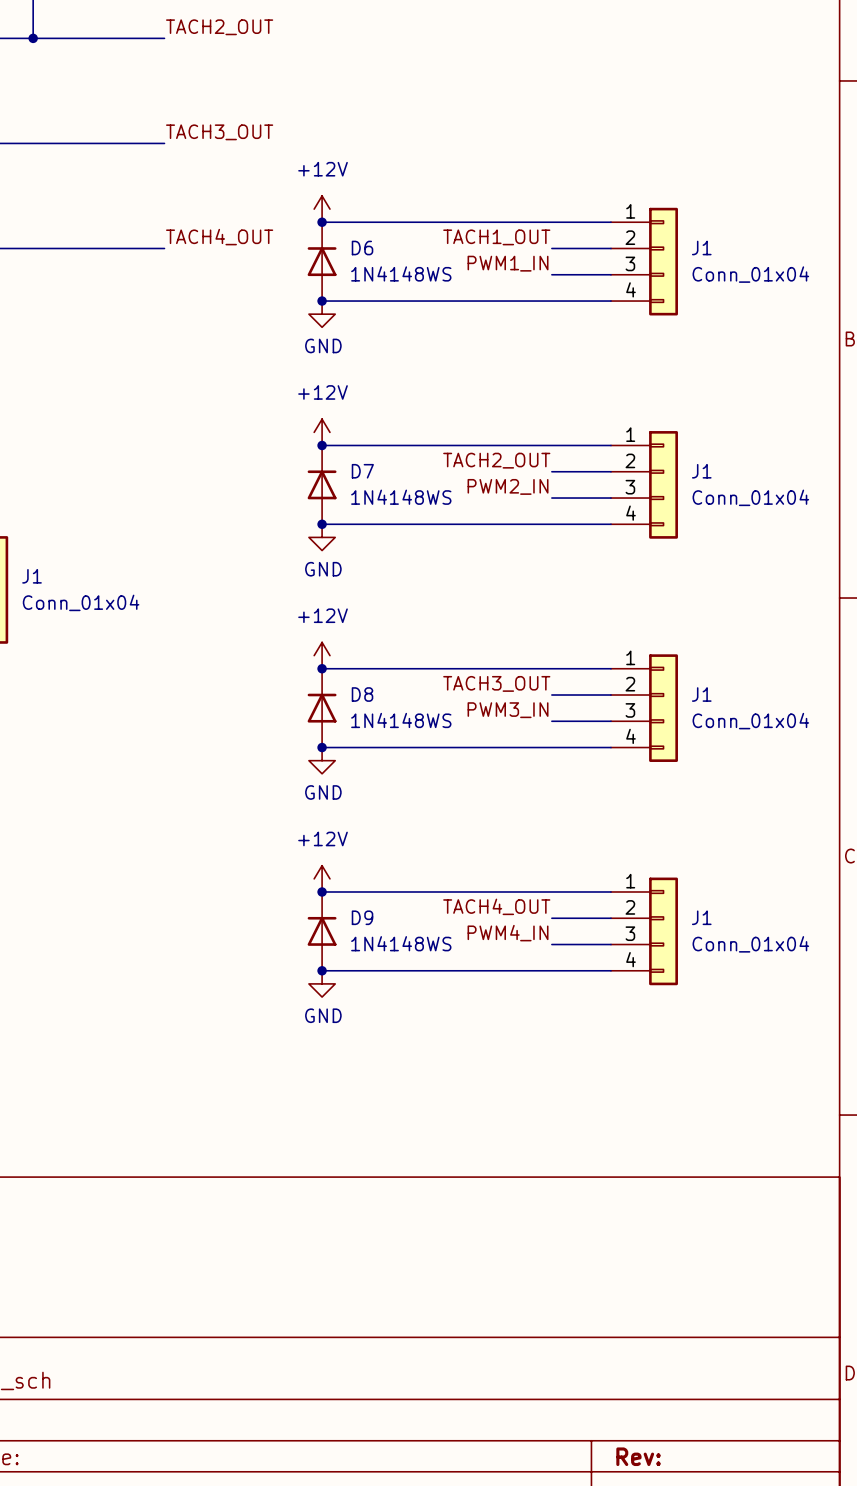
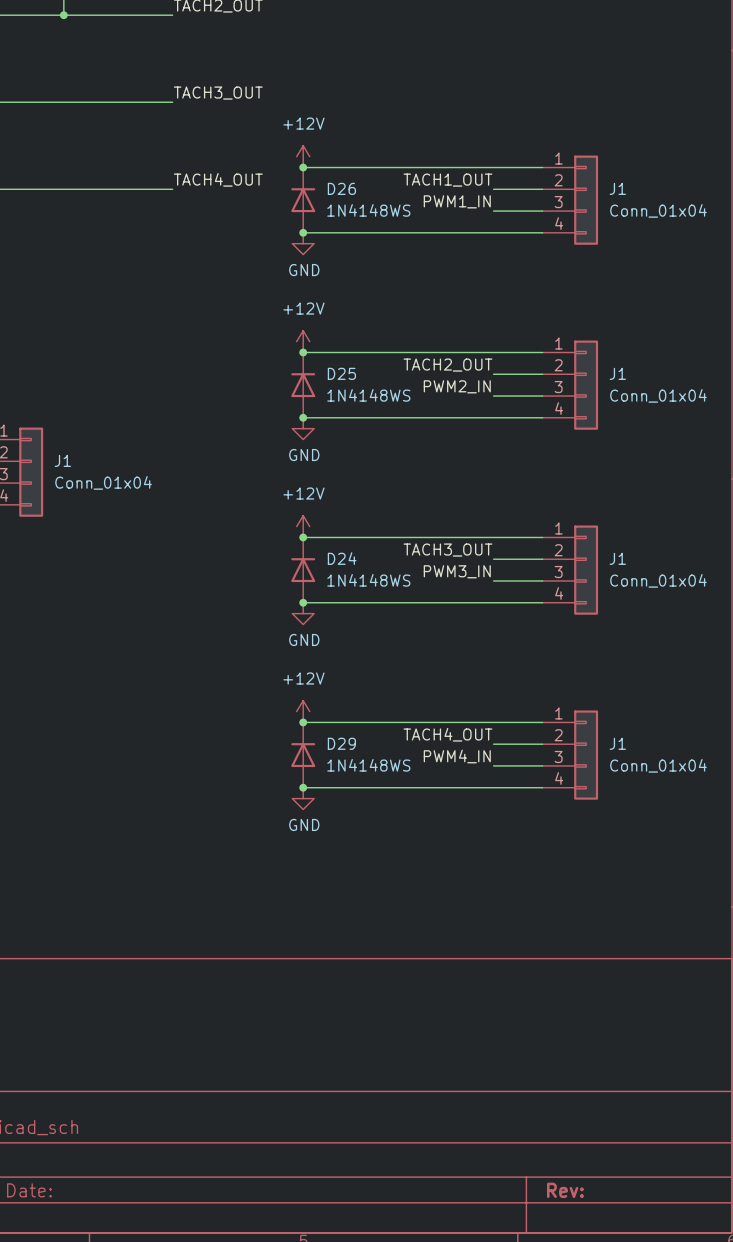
D6 name: D6 (362, 248) -> D26 (341, 188)
D7 name: D7 (362, 471) -> D25 (341, 373)
D8 name: D8 (362, 694) -> D24 (342, 558)
D9 name: D9 (362, 917) -> D29 (341, 743)

